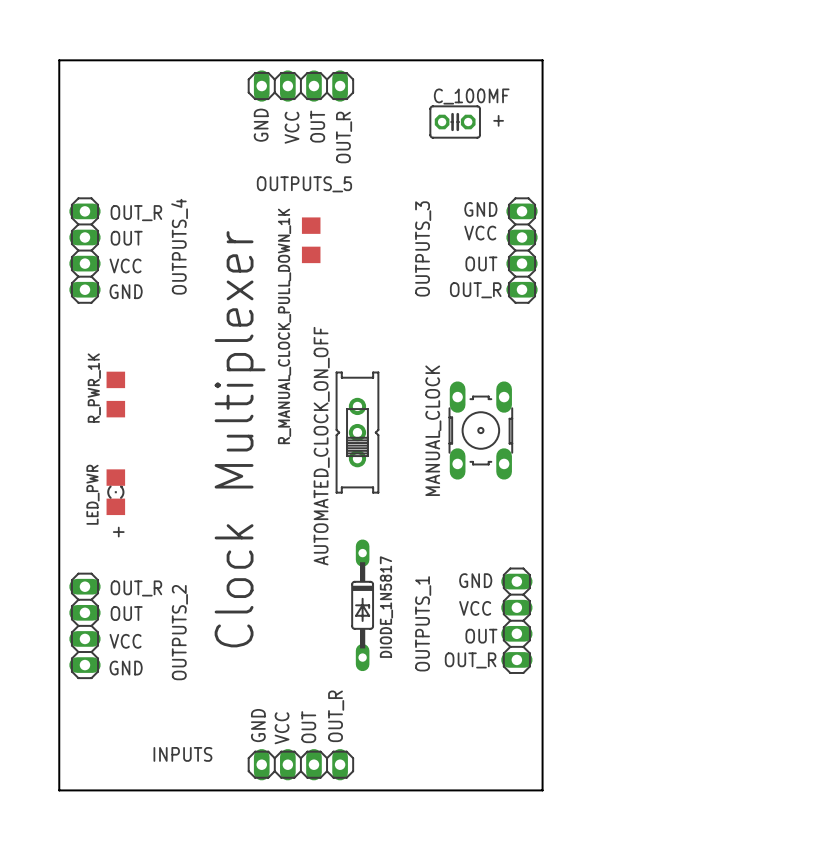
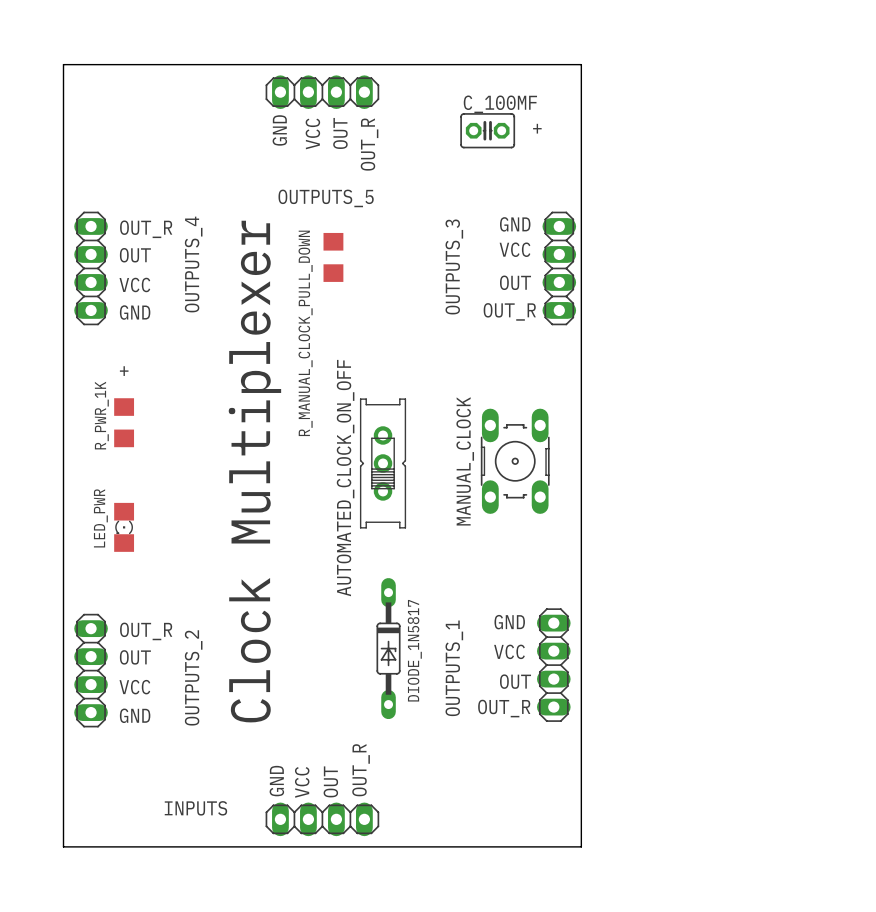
R_MANUAL_CLOCK_PULL_DOWN_1K name: R_MANUAL_CLOCK_PULL_DOWN_1K (284, 326) -> R_MANUAL_CLOCK_PULL_DOWN (305, 333)
LED_PWR rotation: 0° (115, 492) -> 180° (124, 527)
text rotation: 0° (118, 532) -> 90° clockwise (124, 371)
text position: + (118, 532) -> + (124, 371)

